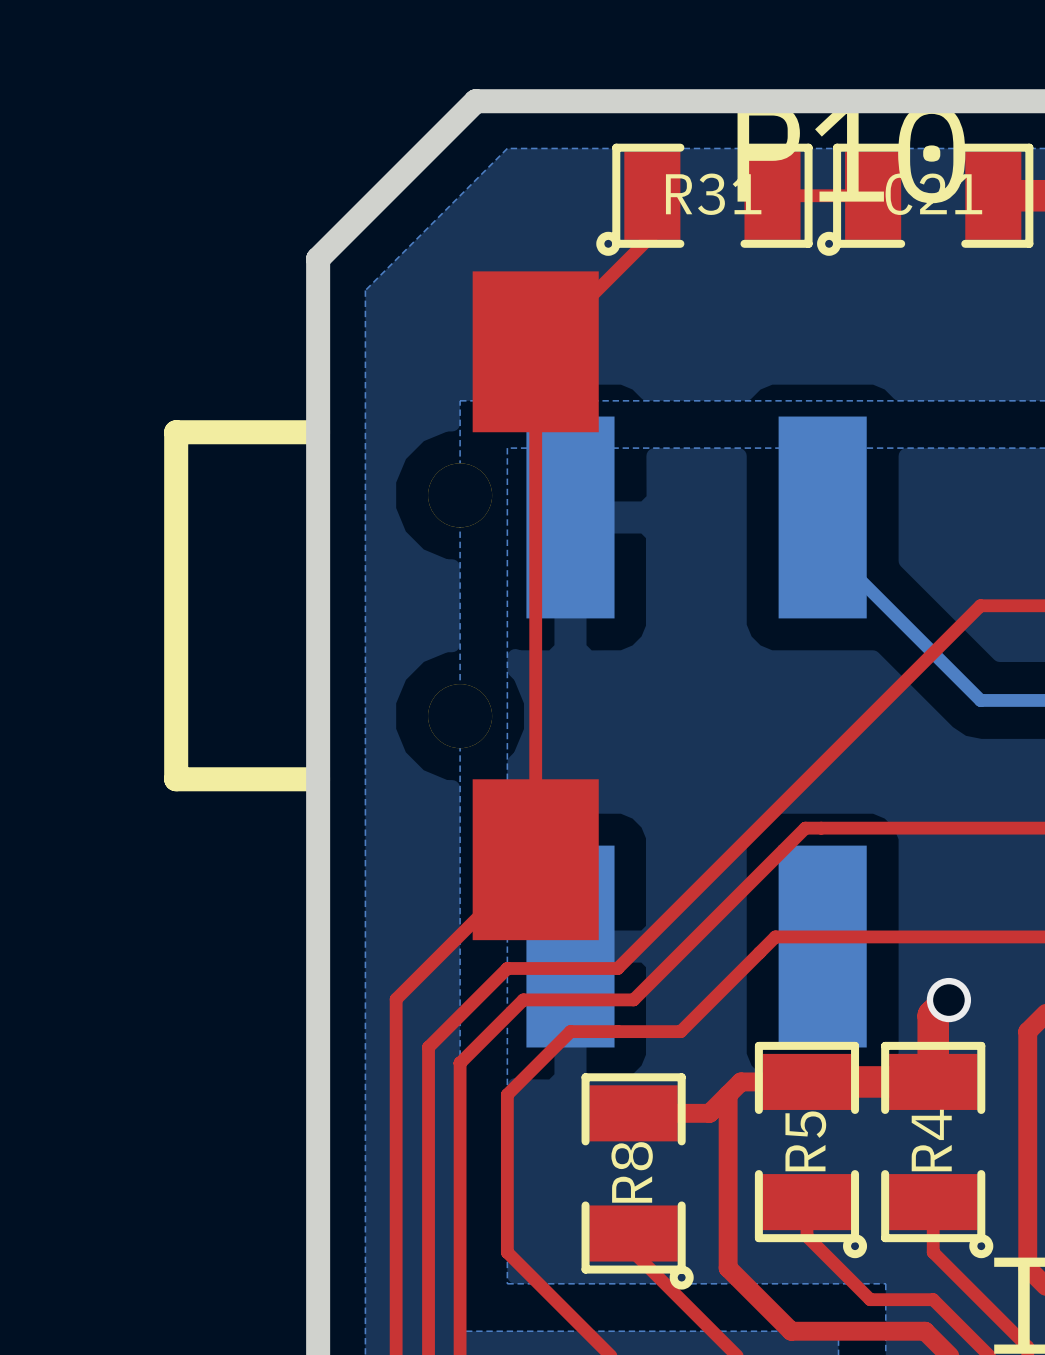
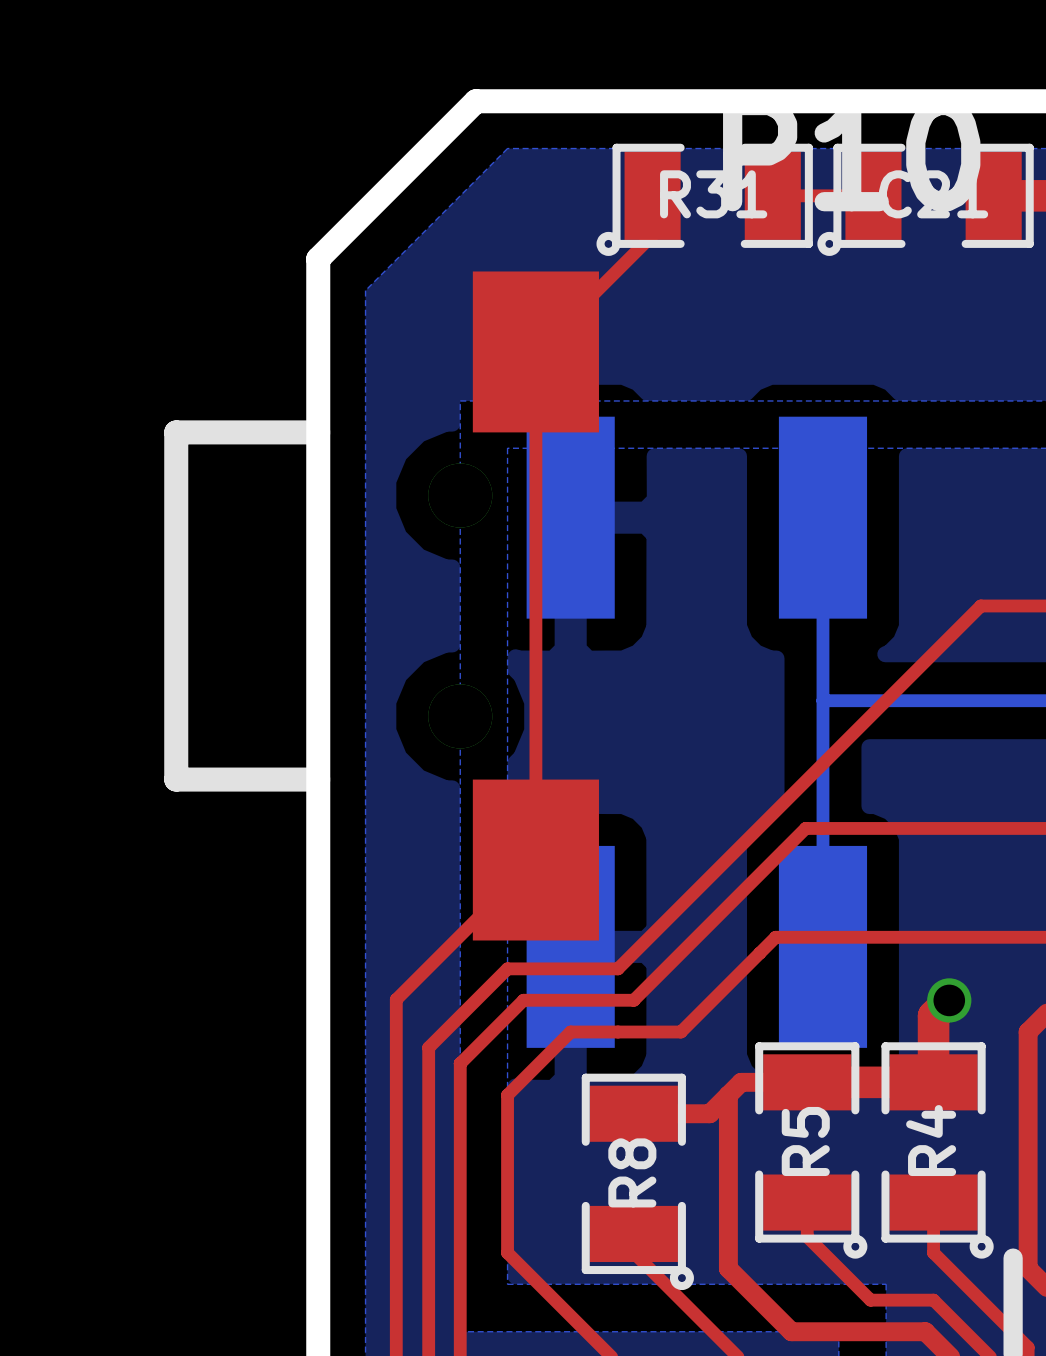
bottom track: (822, 542) (980, 700) -> (822, 700) (981, 700)
bottom track: none -> (822, 542) (822, 946)

